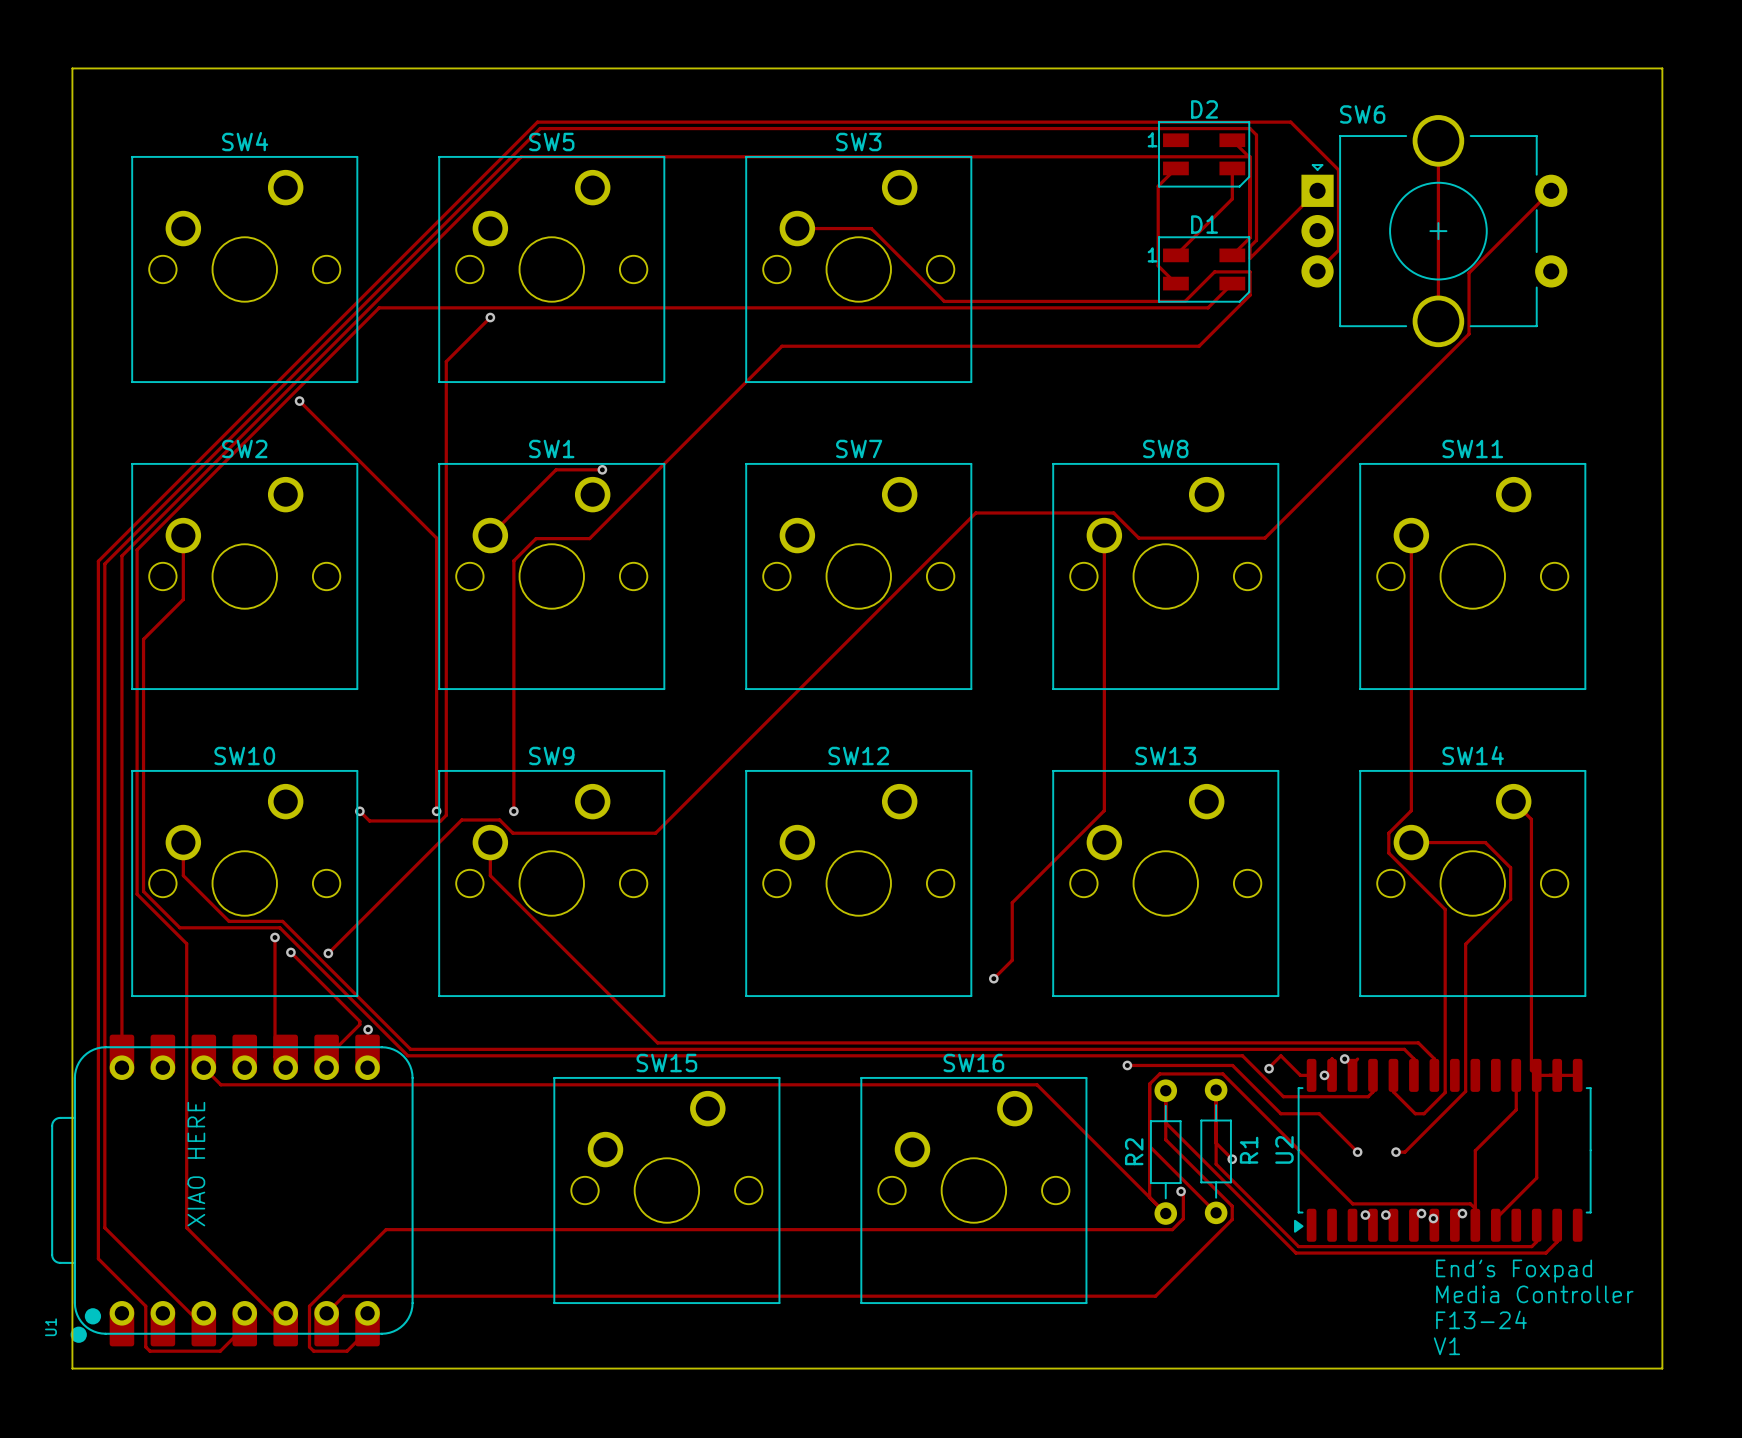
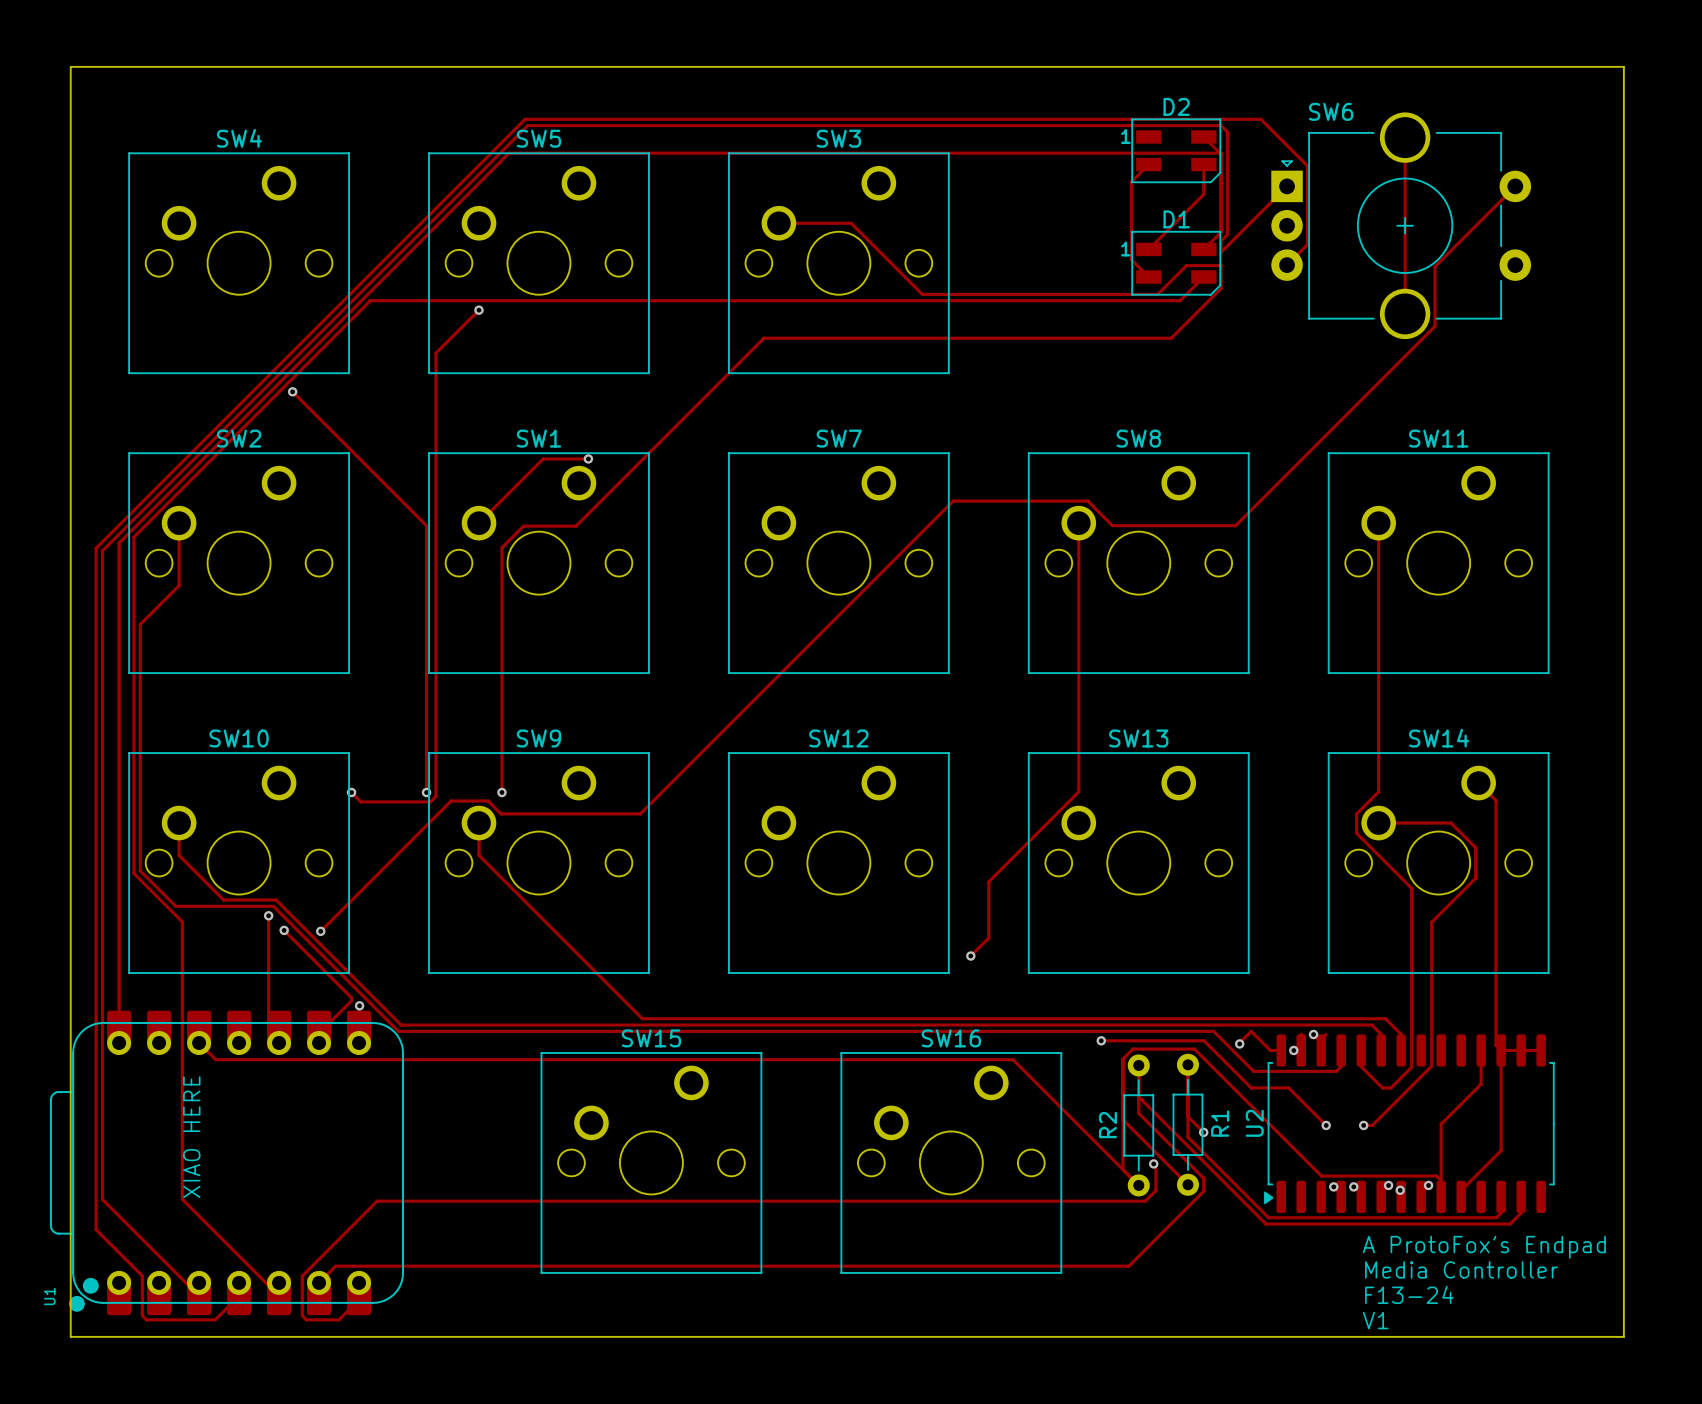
text: End's Foxpad (1514, 1271) -> none
text: none -> A ProtoFox's Endpad (1484, 1247)
text position: Media Controller (1534, 1294) -> Media Controller (1461, 1269)
text position: F13-24 (1481, 1319) -> F13-24 (1409, 1294)
text position: V1 (1446, 1346) -> V1 (1375, 1320)

